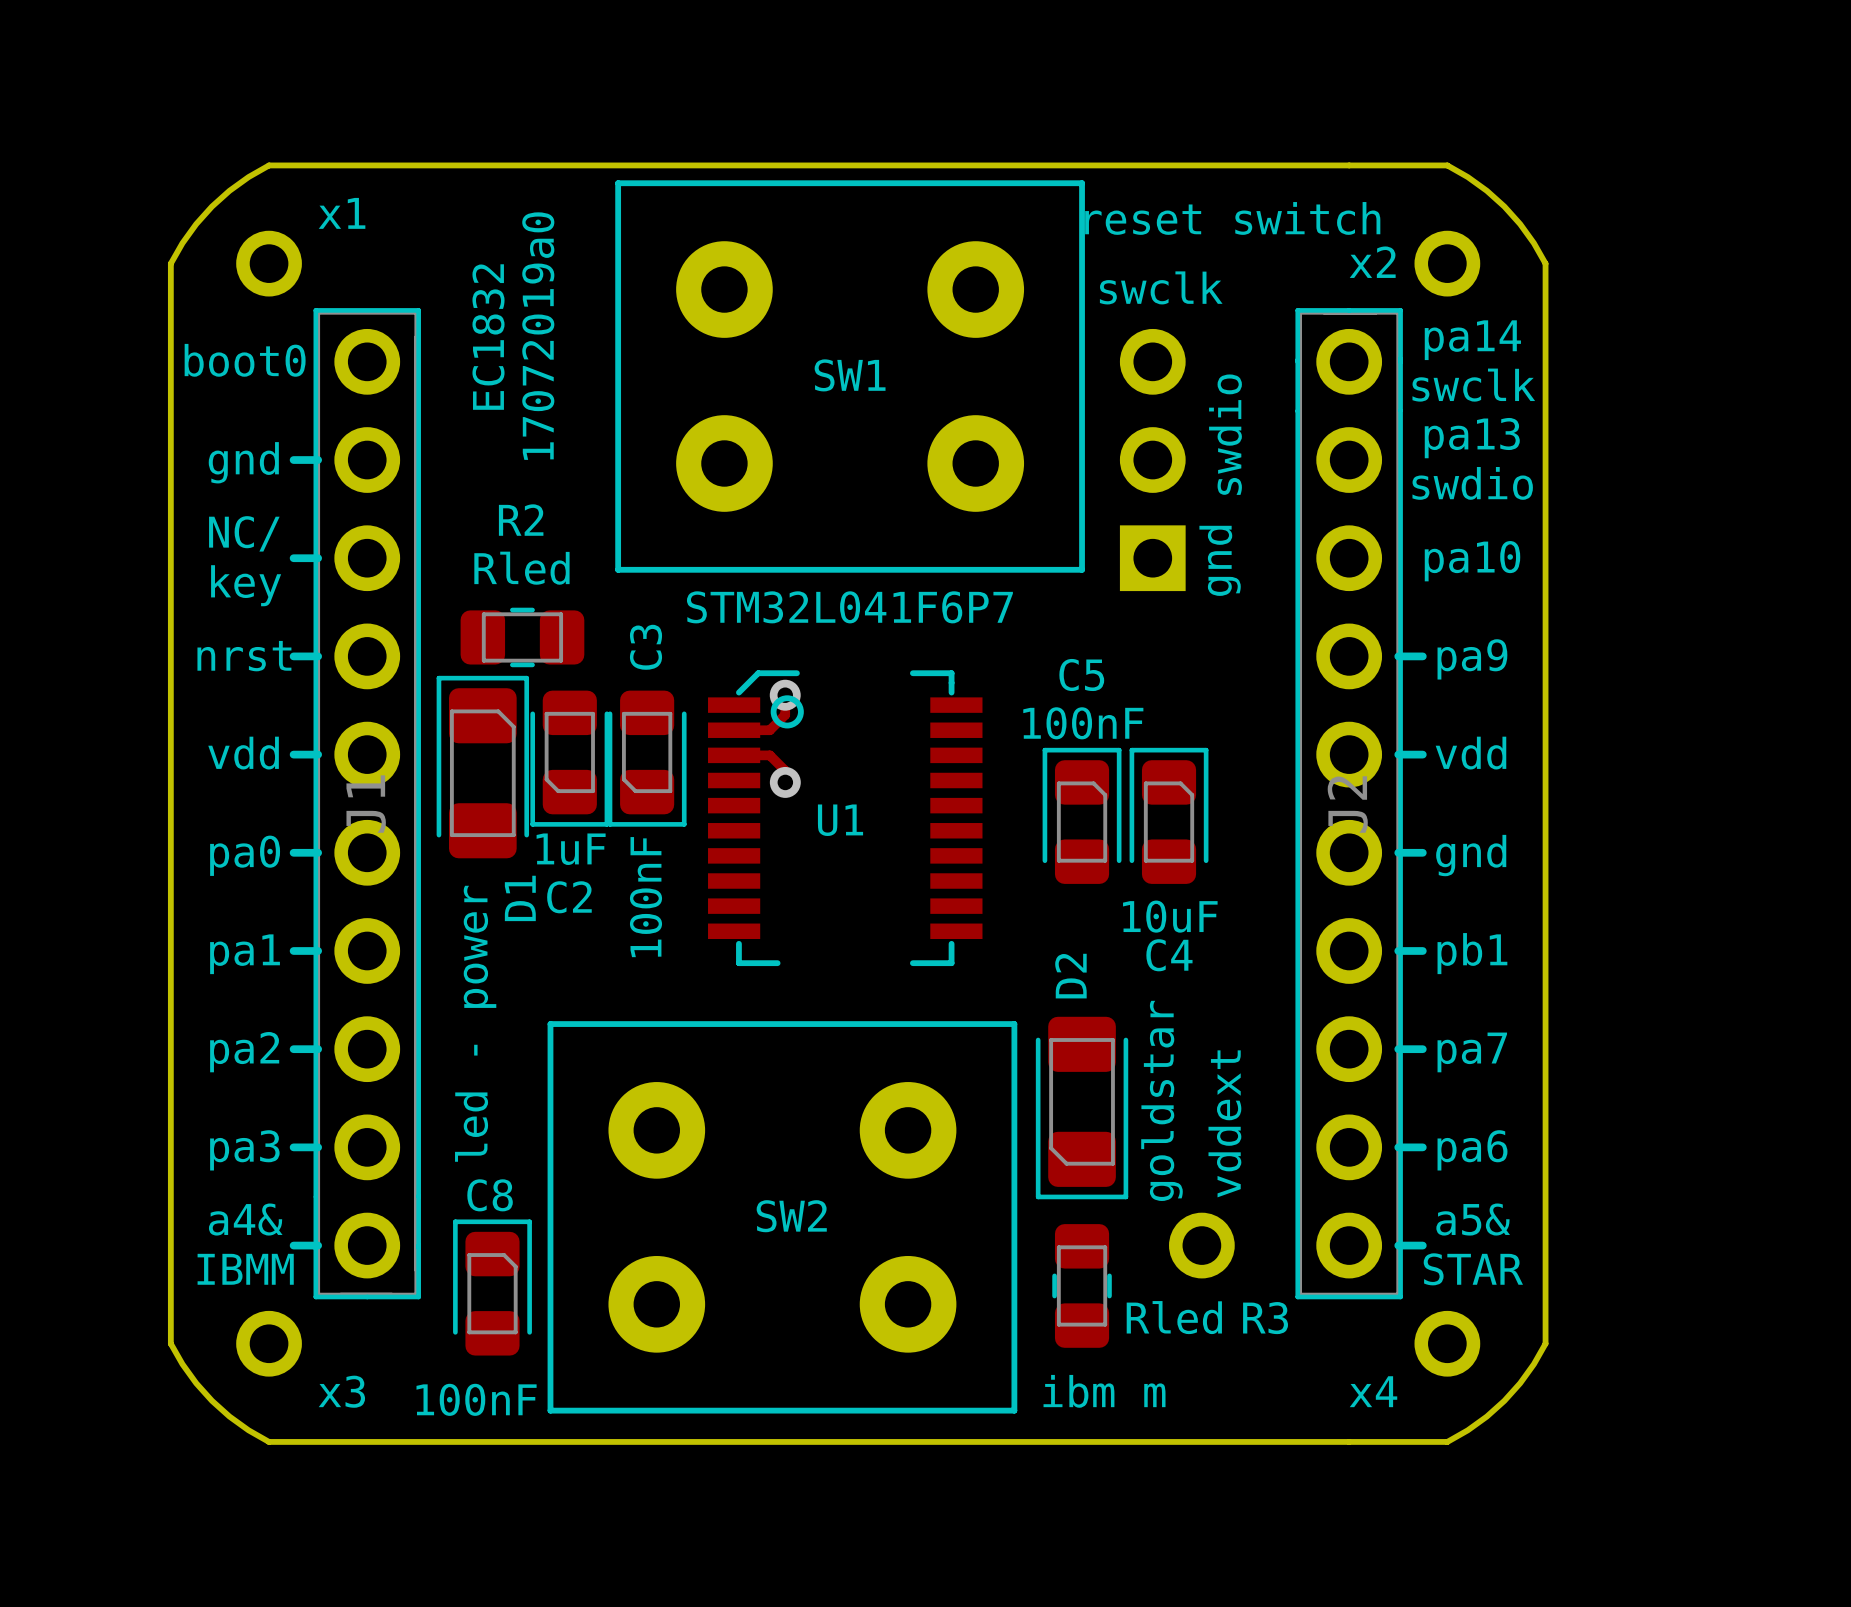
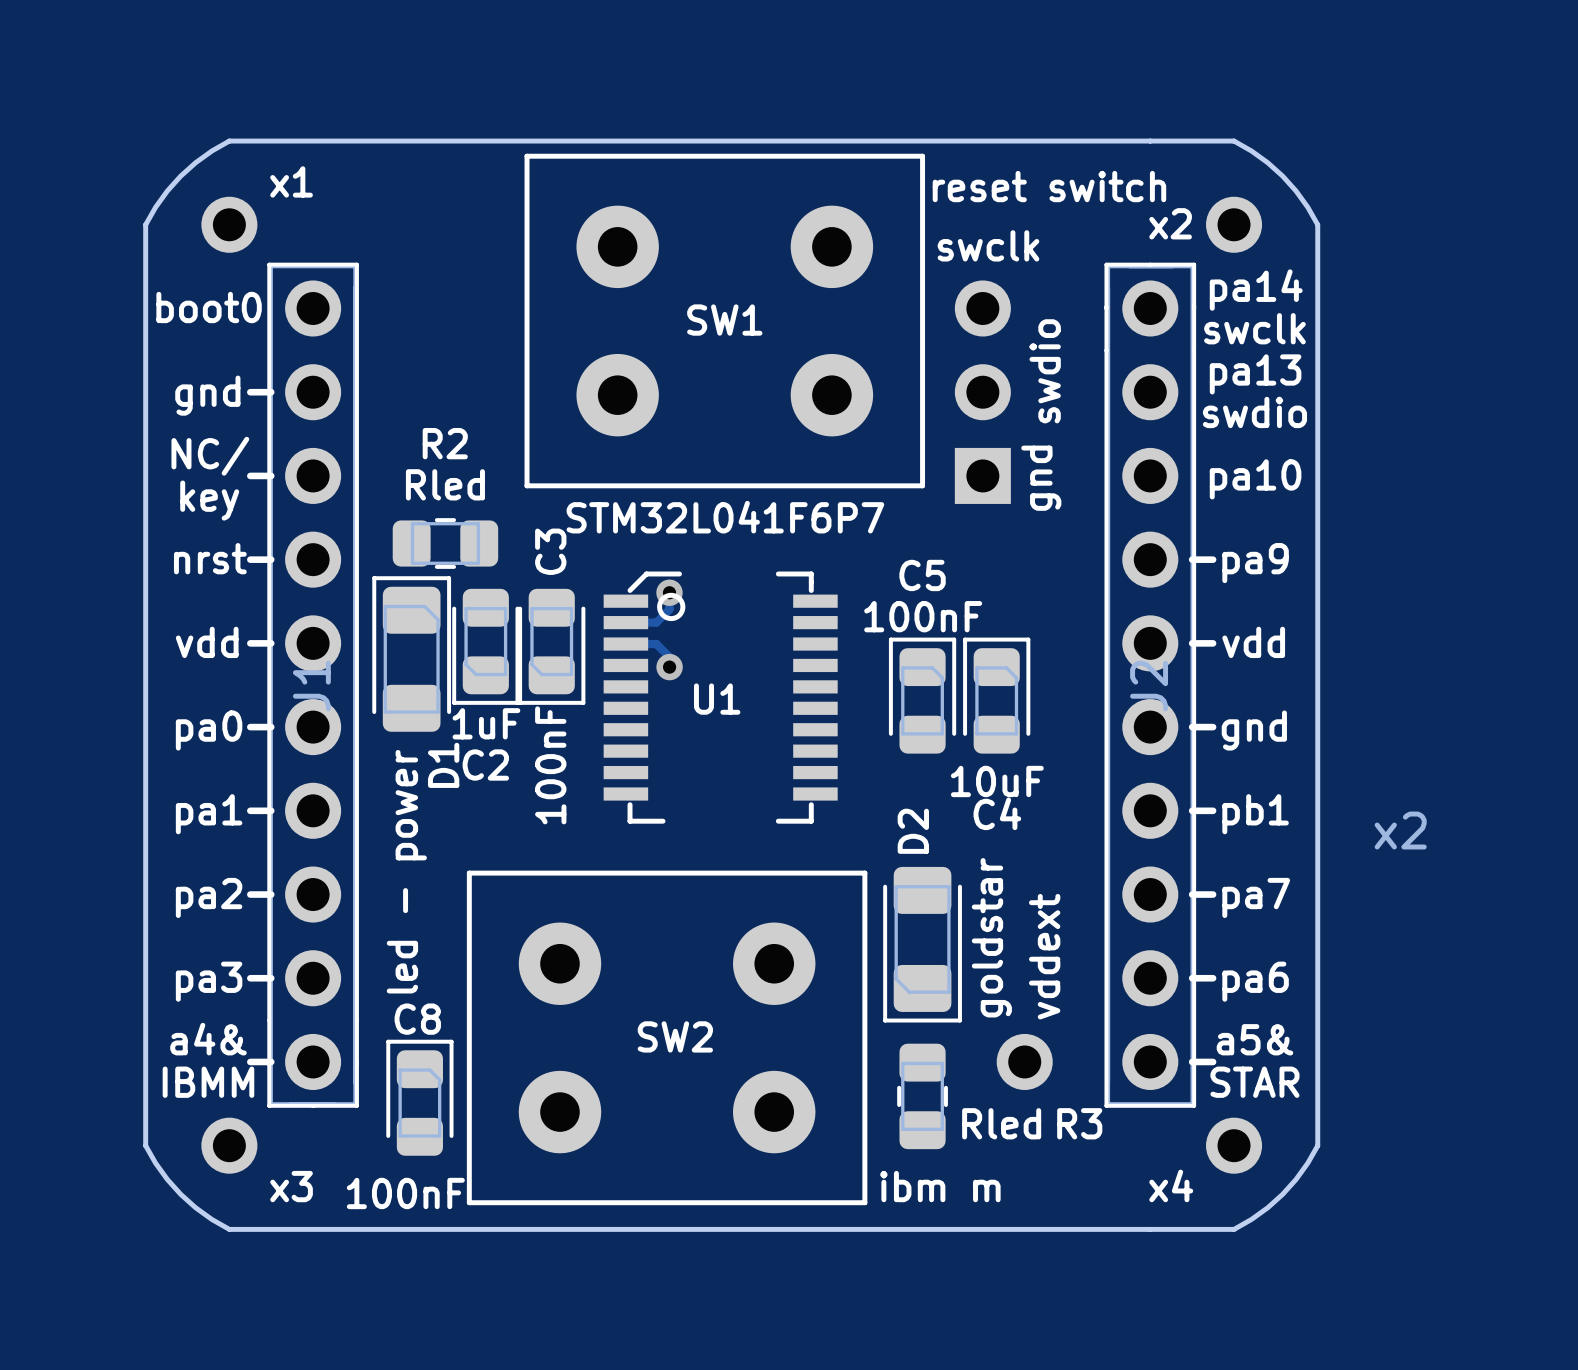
text: 17072019а0 (538, 336) -> none
text: ЕС1832 (488, 337) -> none
drawing: none -> [1374, 811, 1427, 850]

